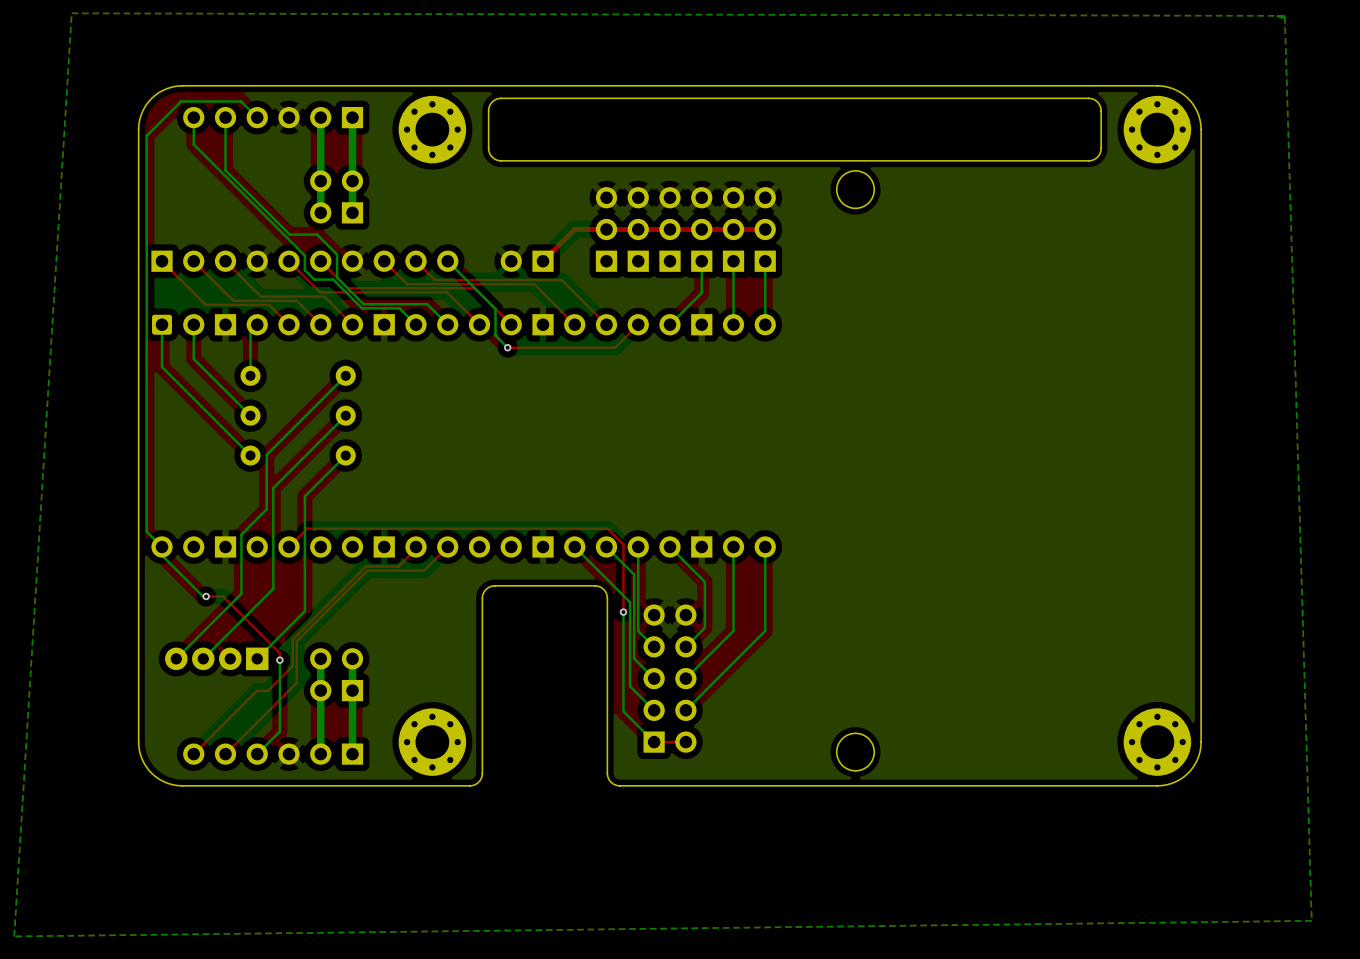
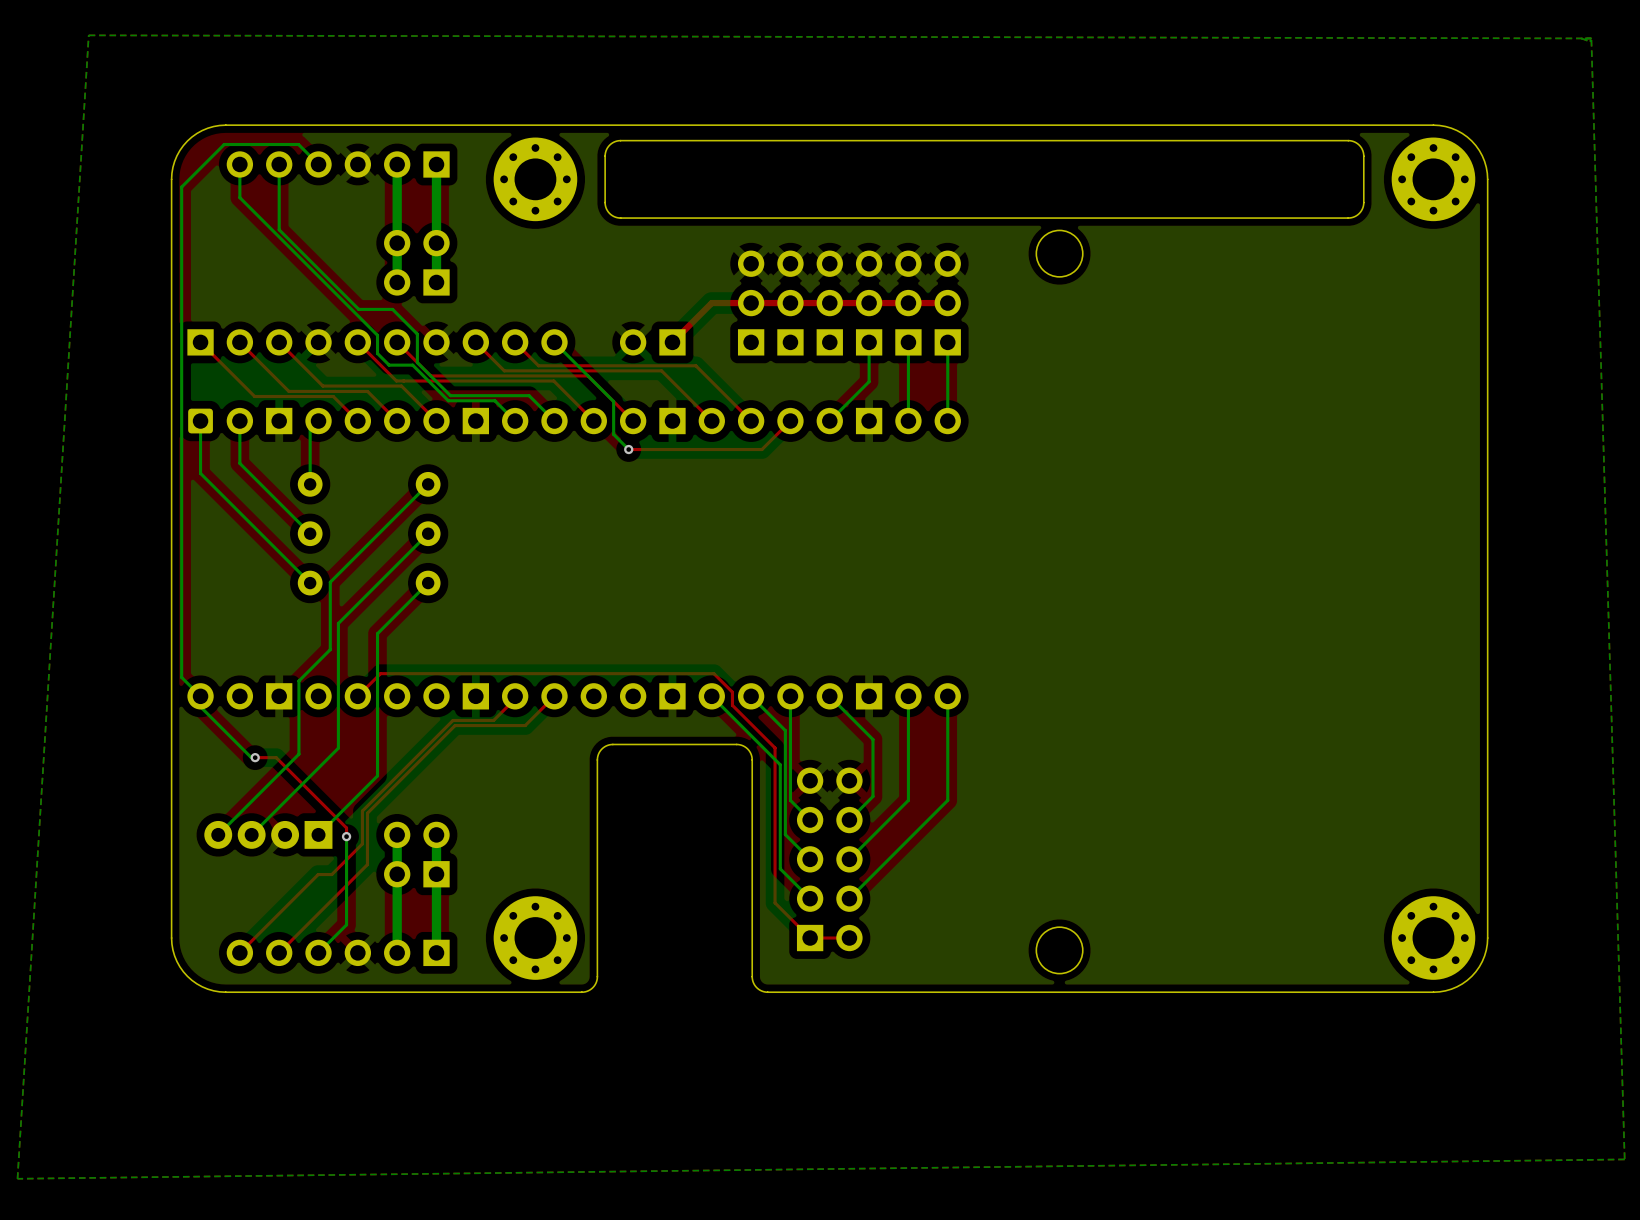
top track: (576, 528) (607, 528) (623, 544) (623, 612) -> (713, 673) (732, 692) (732, 705) (775, 747) (775, 902) (810, 938)
bottom track: (623, 612) (623, 711) (654, 742) -> none
via: (623, 612) -> none

